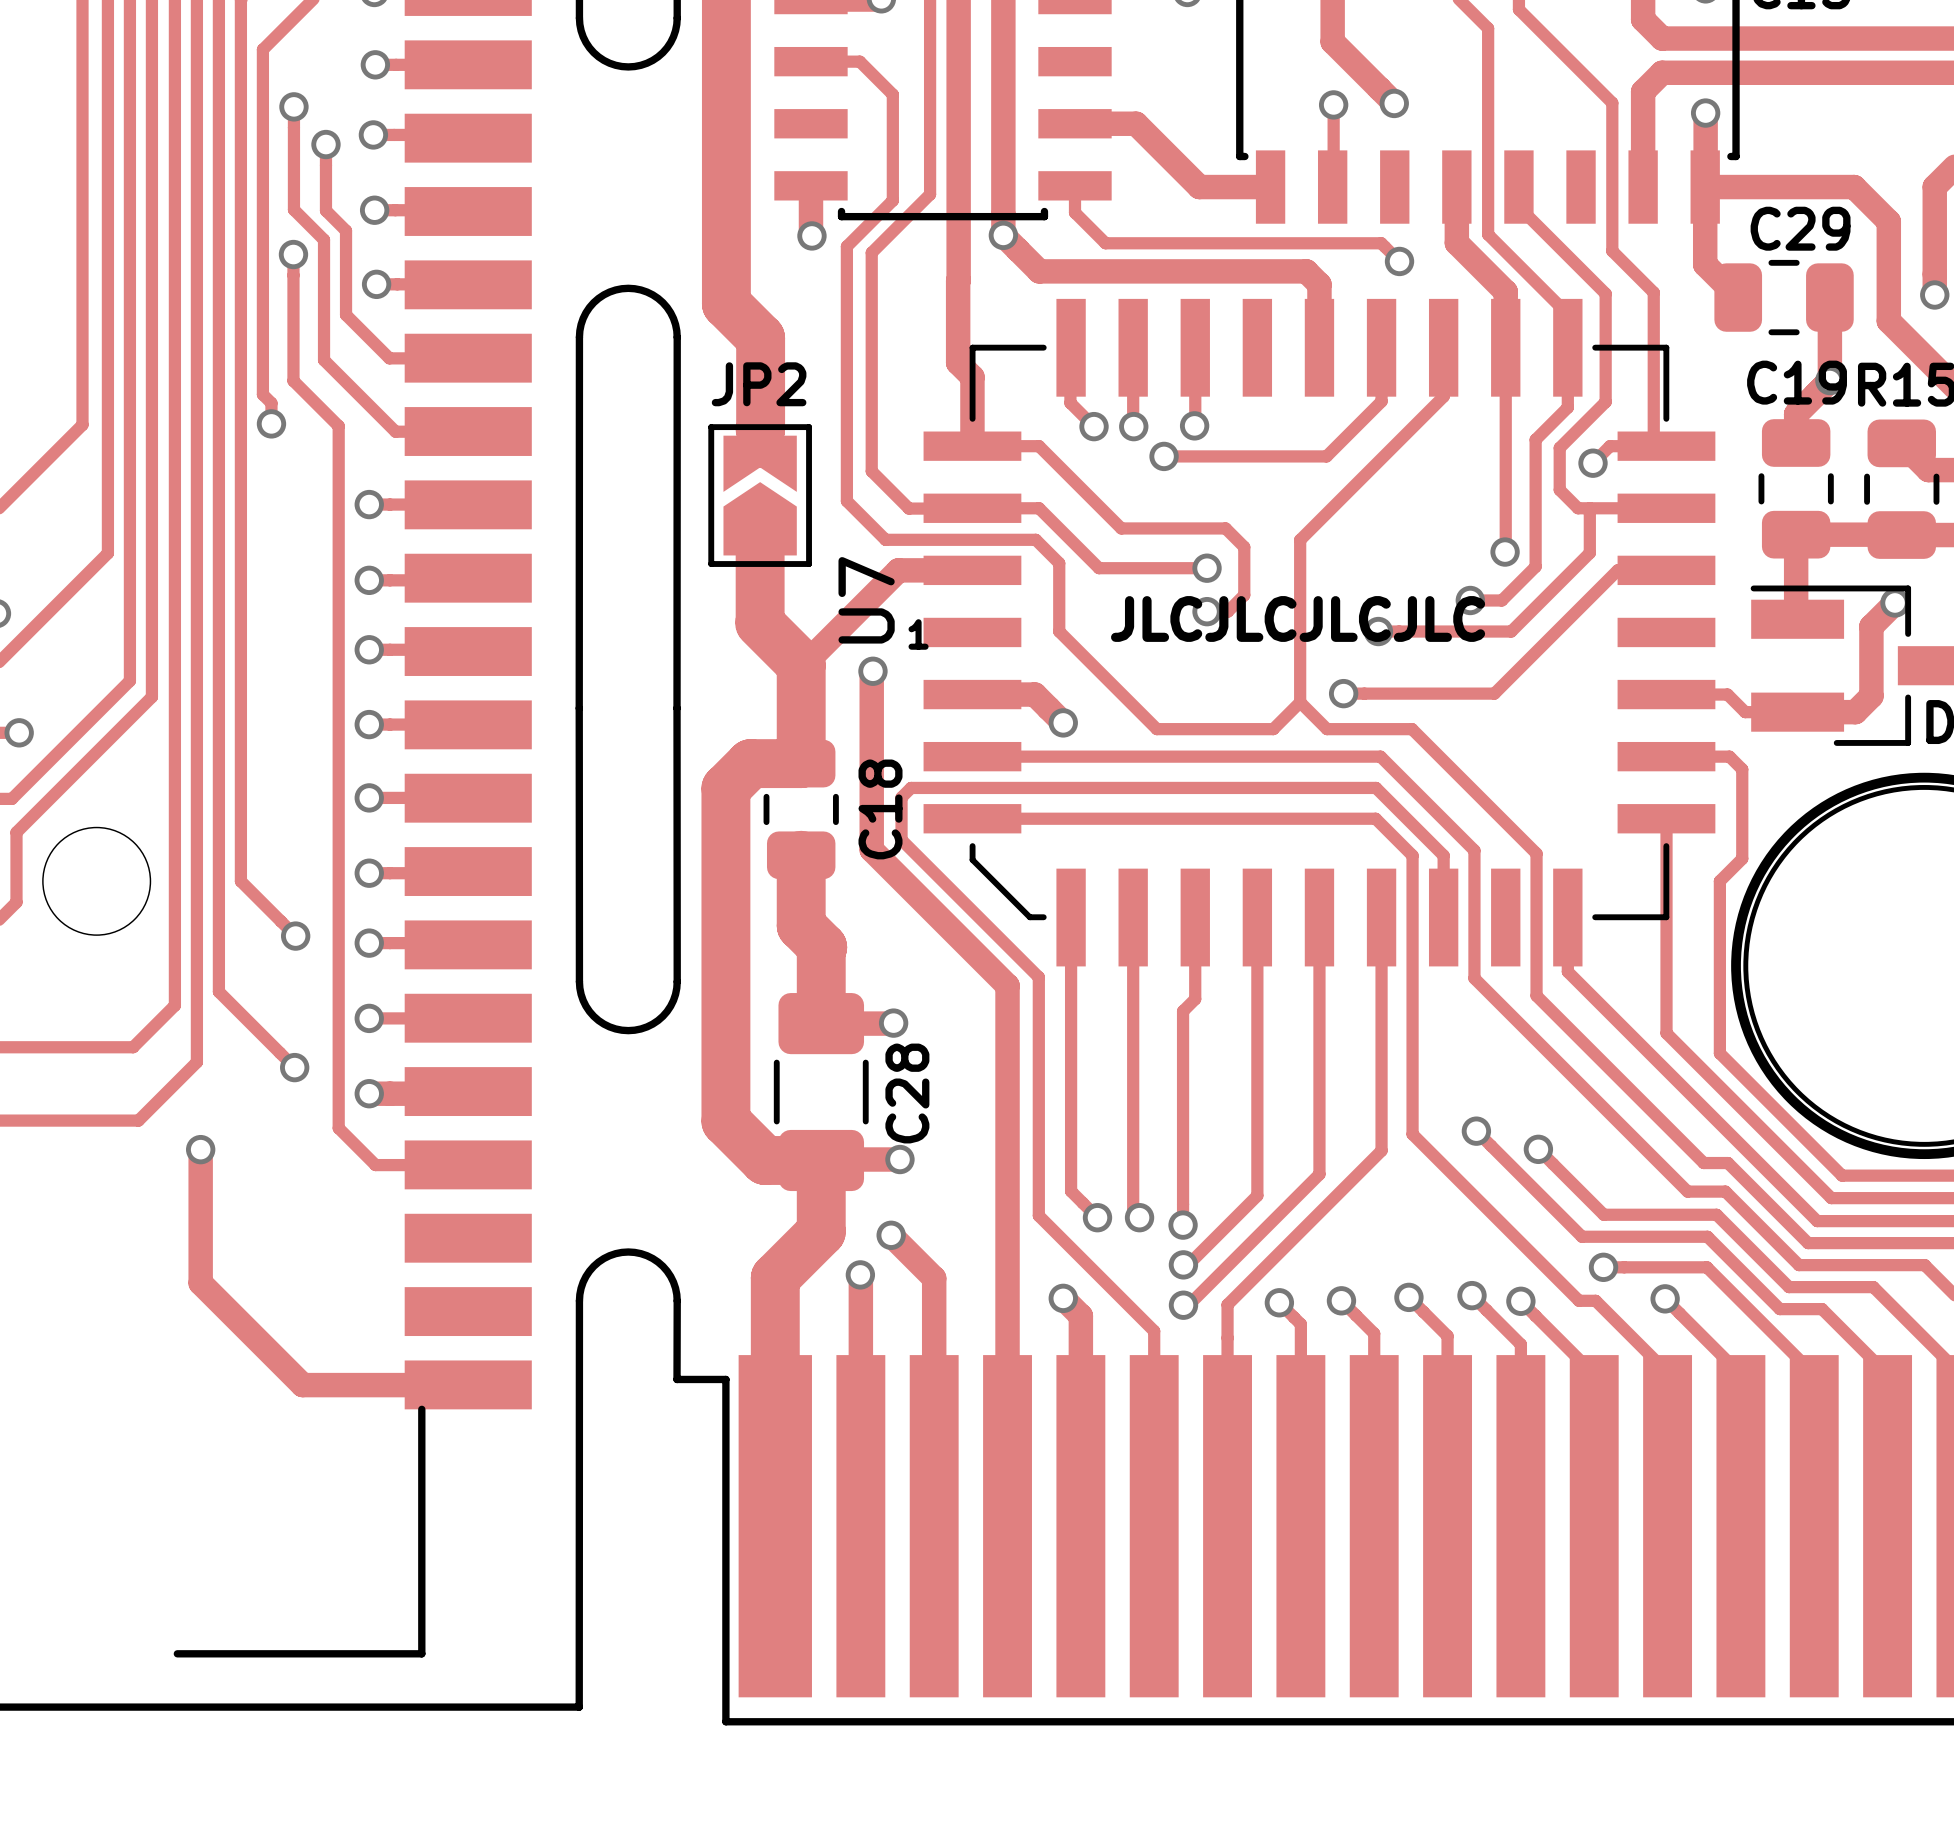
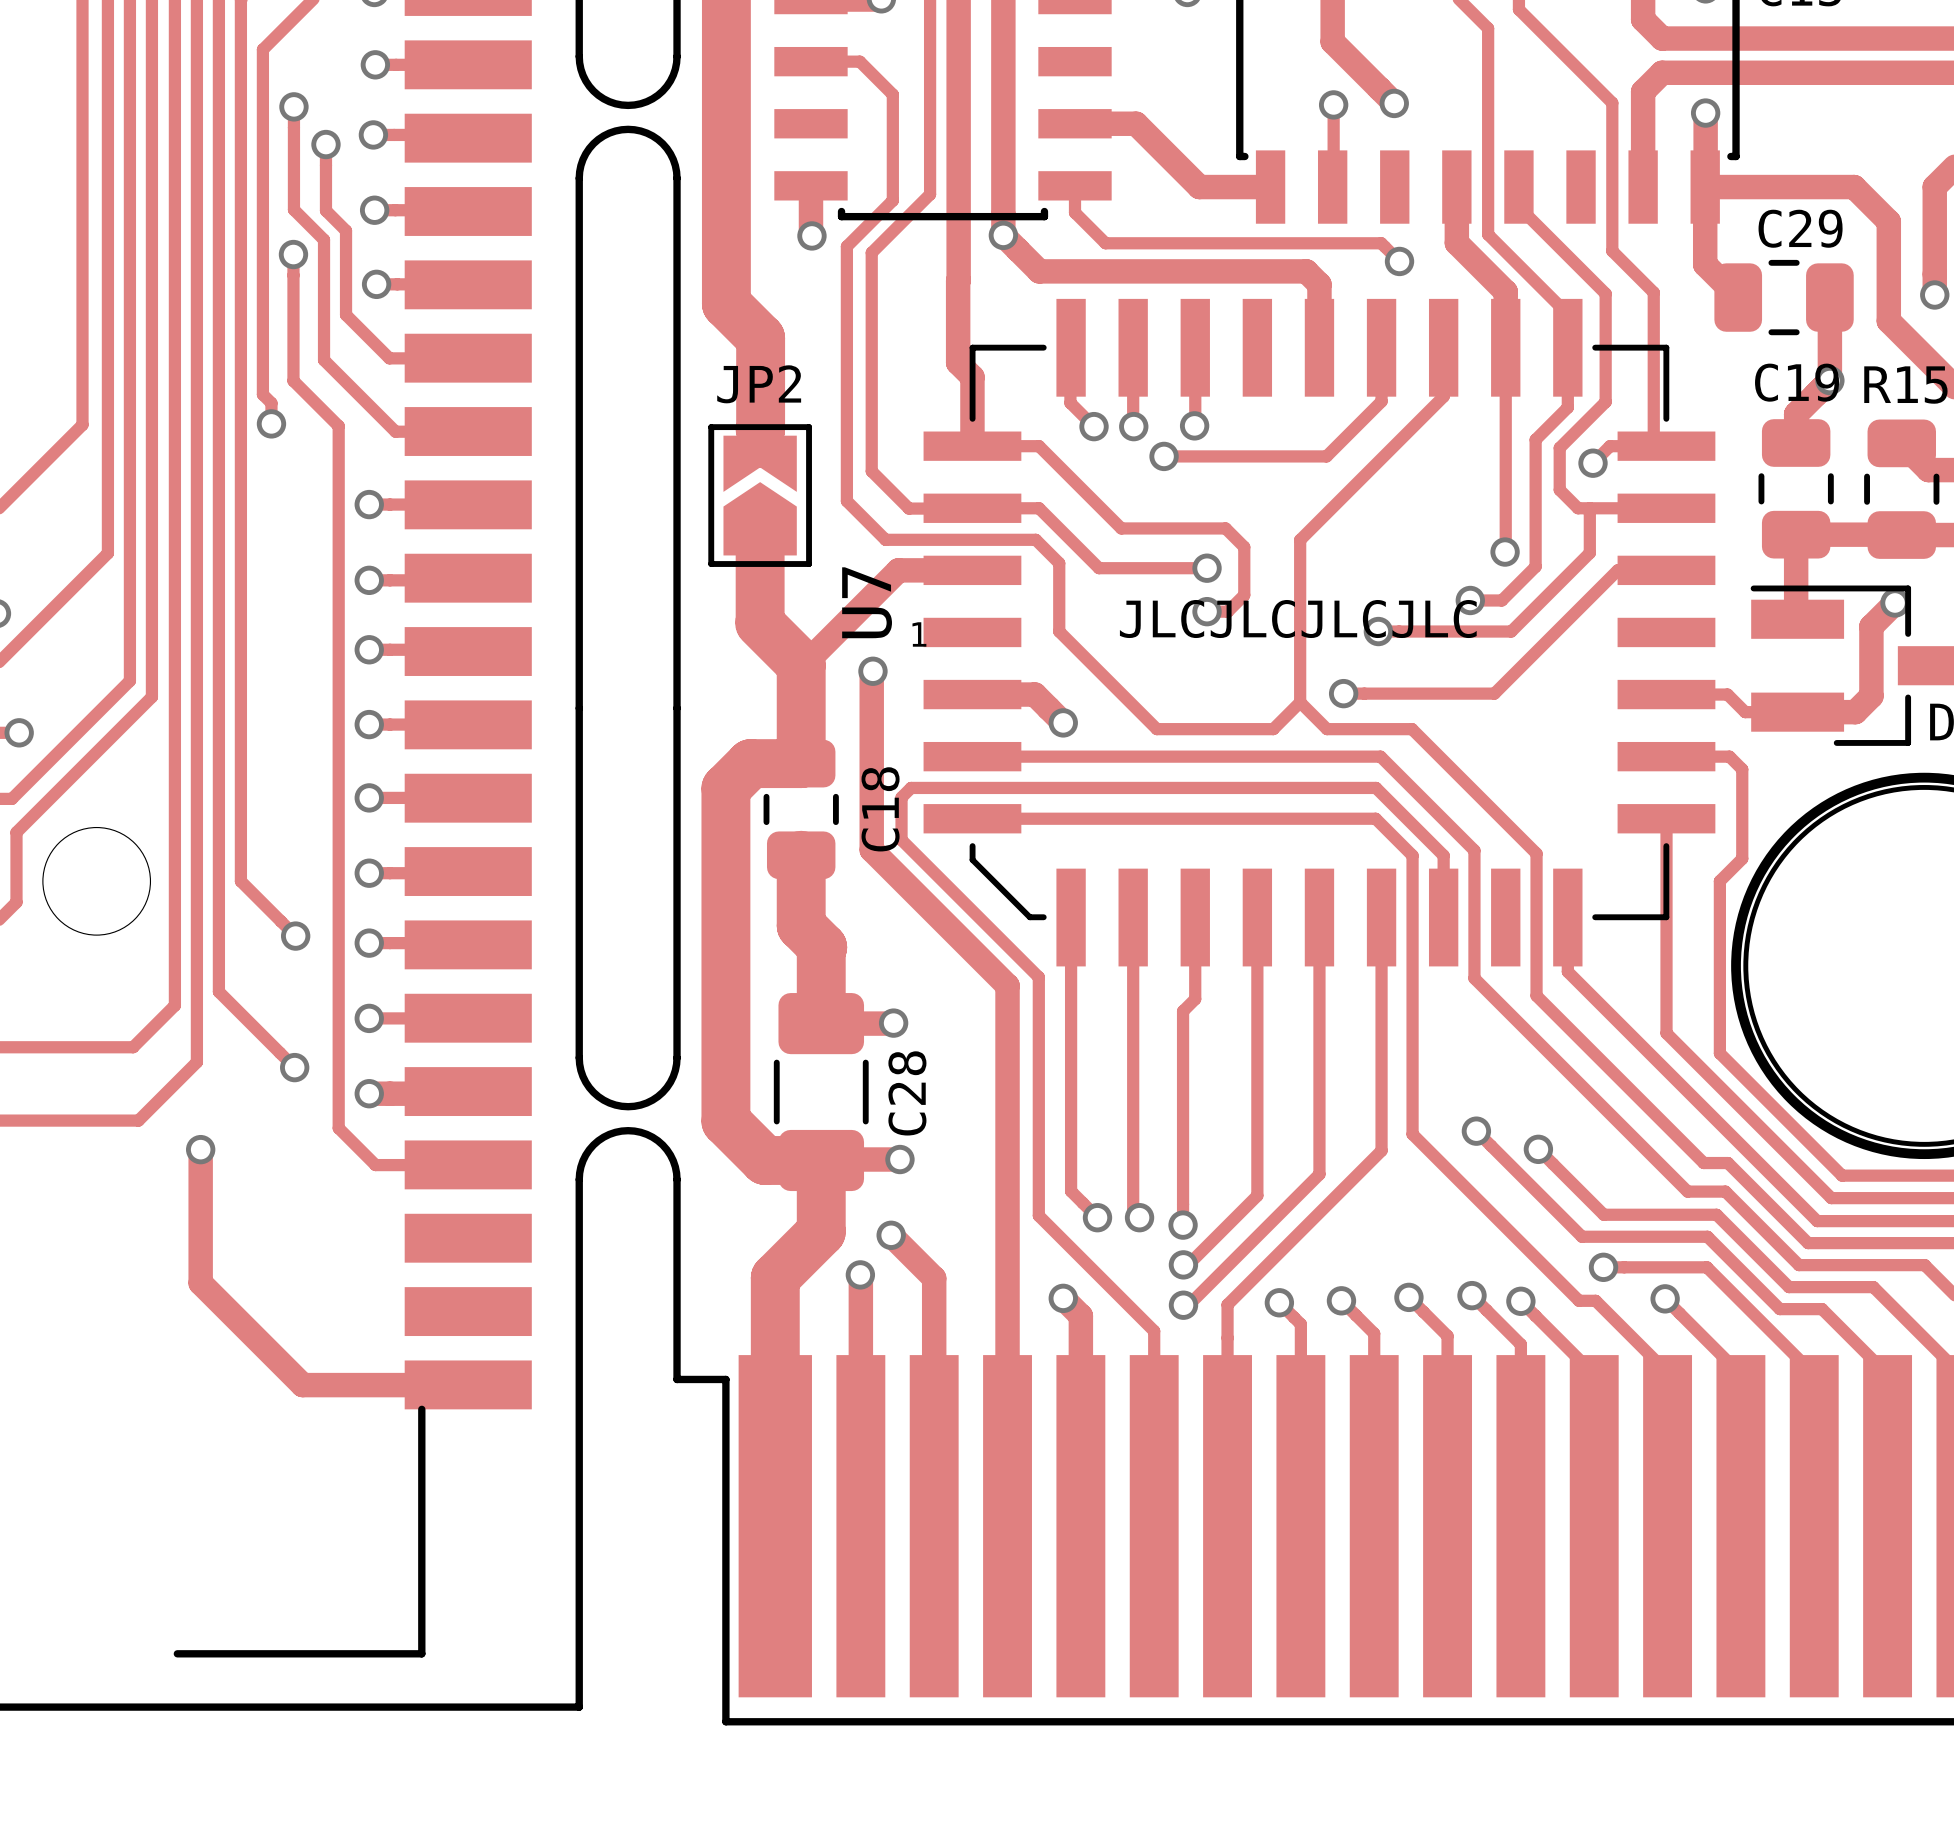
board edge: (579, 18) (583, 36) (593, 52) (609, 63) (628, 66) (647, 63) (662, 52) (673, 36) (677, 18) -> (579, 18) (579, 62) (585, 80) (593, 91) (603, 98) (615, 103) (628, 105) (640, 103) (652, 98) (662, 91) (670, 80) (676, 62) (677, 18)
board edge: (579, 337) (579, 988) (585, 1006) (598, 1020) (615, 1028) (634, 1030) (652, 1024) (667, 1011) (675, 994) (677, 981) (676, 330) (670, 312) (662, 302) (647, 292) (628, 288) (609, 292) (593, 302) (583, 318) (579, 337) -> (579, 178) (579, 1057) (582, 1076) (593, 1092) (609, 1102) (628, 1106) (646, 1102) (662, 1092) (673, 1076) (677, 1057) (677, 178) (673, 159) (662, 143) (646, 133) (628, 129) (609, 133) (593, 143) (582, 159) (579, 178)
board edge: (677, 1379) (677, 1300) (675, 1288) (670, 1276) (658, 1262) (640, 1253) (621, 1252) (603, 1258) (593, 1266) (585, 1276) (581, 1288) (579, 1300) (579, 1707) -> (677, 1379) (677, 1179) (675, 1166) (666, 1149) (652, 1137) (634, 1131) (615, 1132) (598, 1140) (589, 1149) (580, 1166) (579, 1179) (579, 1707)

